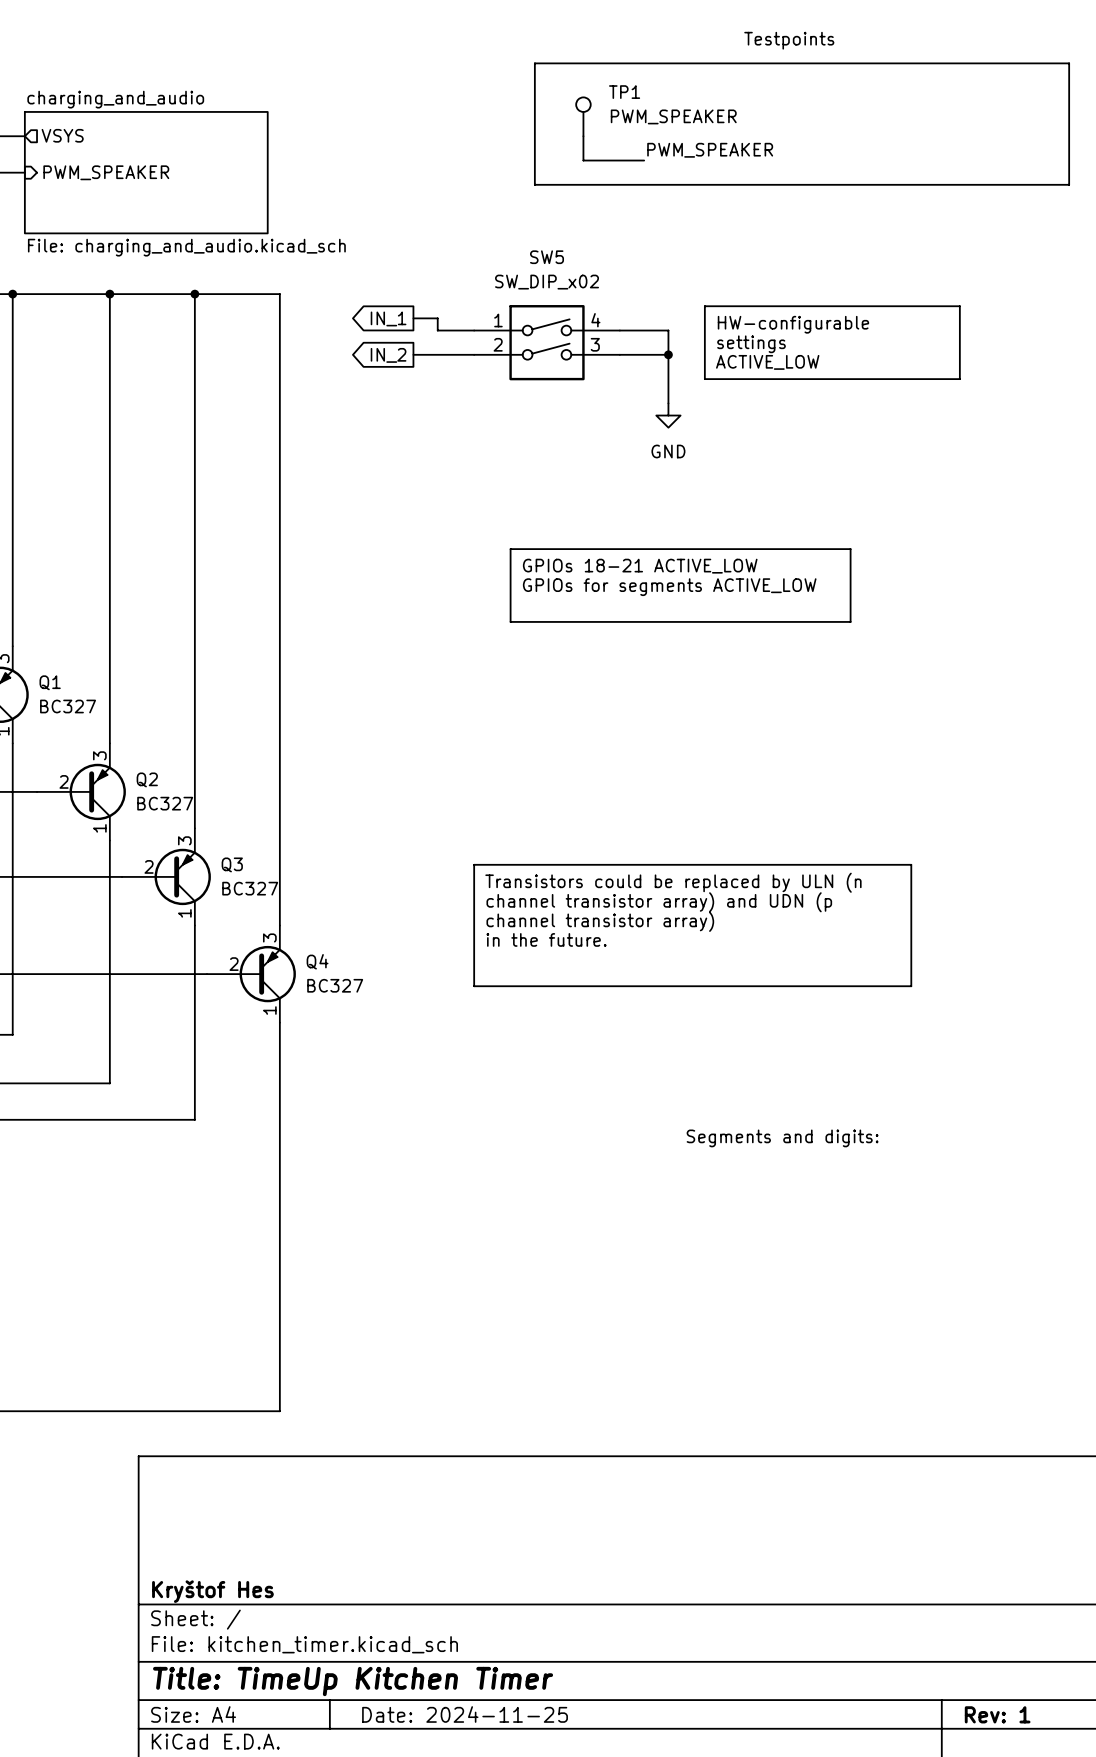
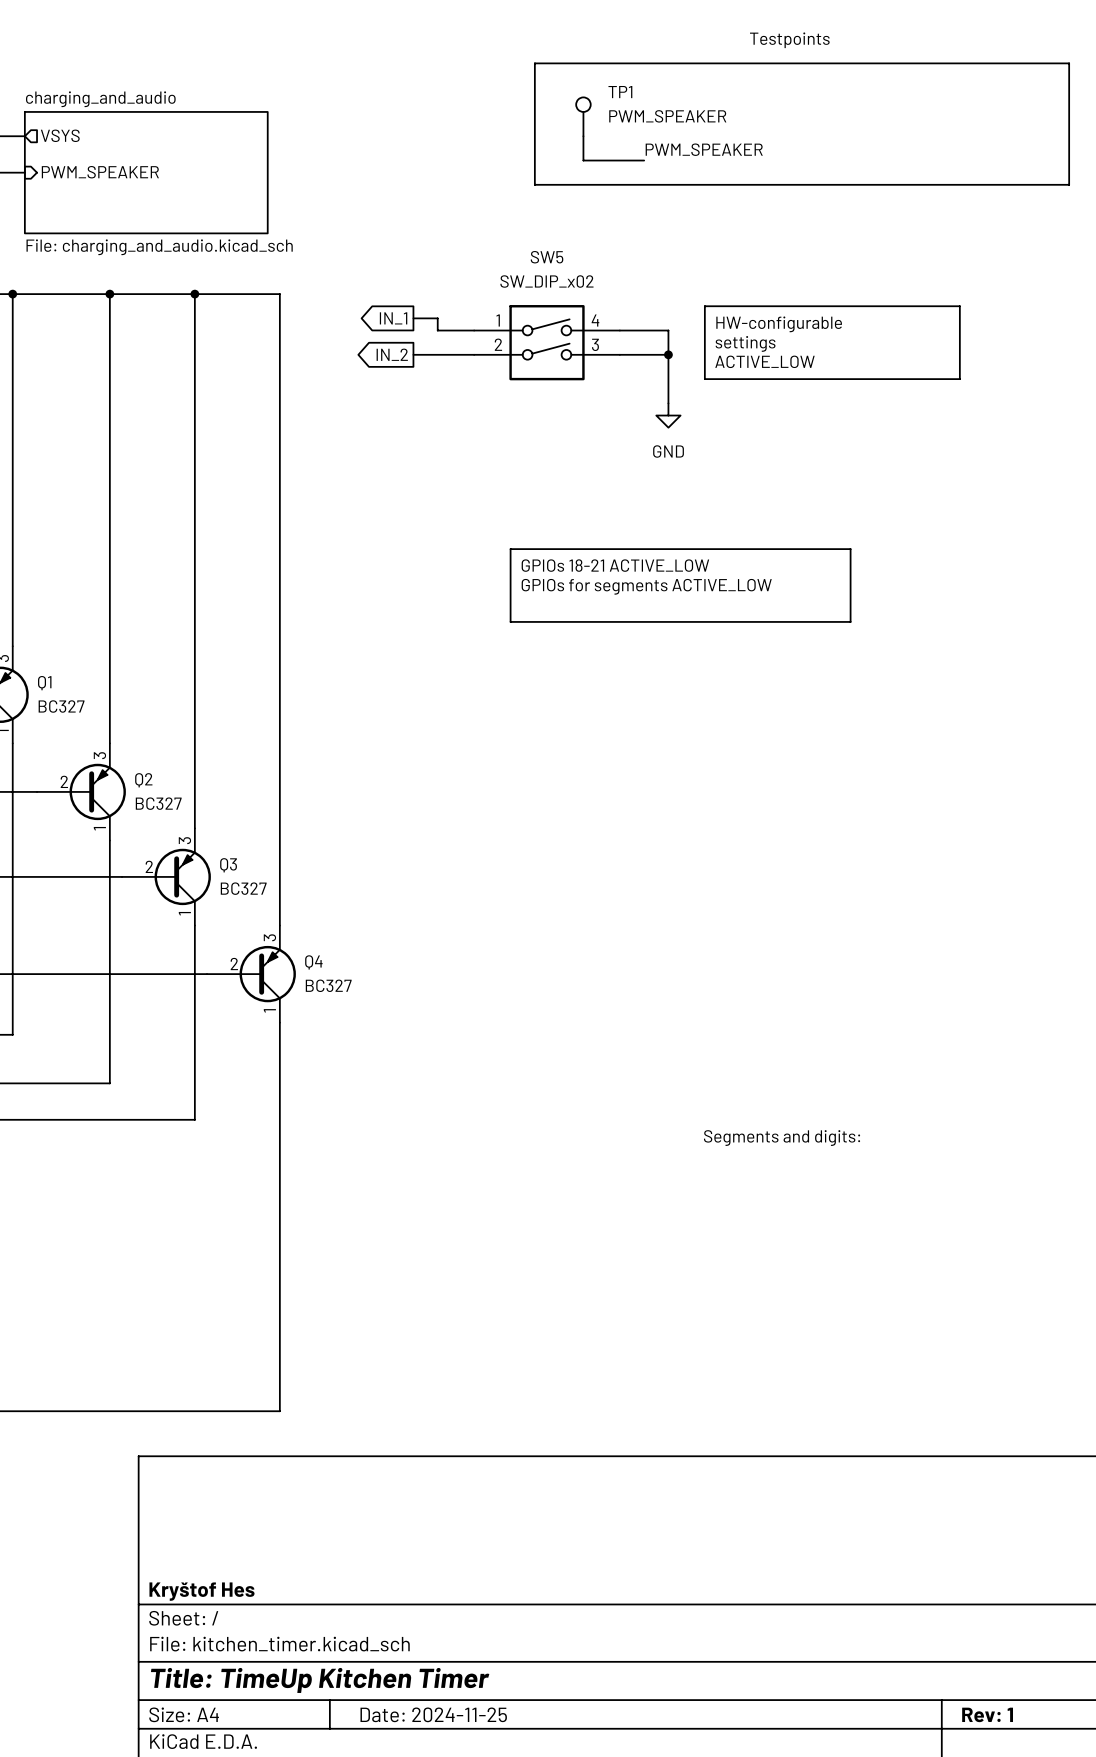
line: (474, 864) (911, 864) (911, 986) (474, 986) (474, 864) -> none
text: Transistors could be replaced by ULN (n (673, 882) -> none
text: channel transistor array) and UDN (p (659, 902) -> none
text: channel transistor array) (600, 921) -> none
text: in the future. (546, 939) -> none

